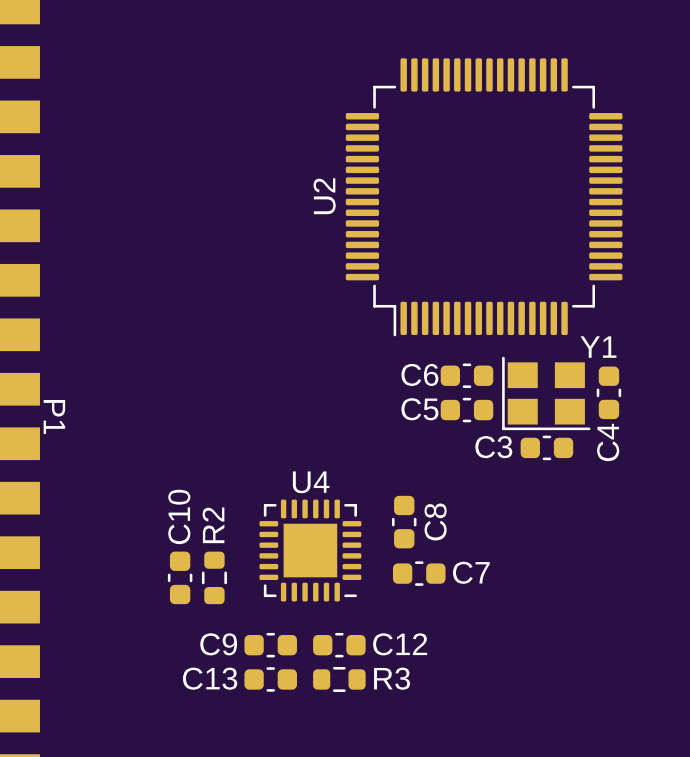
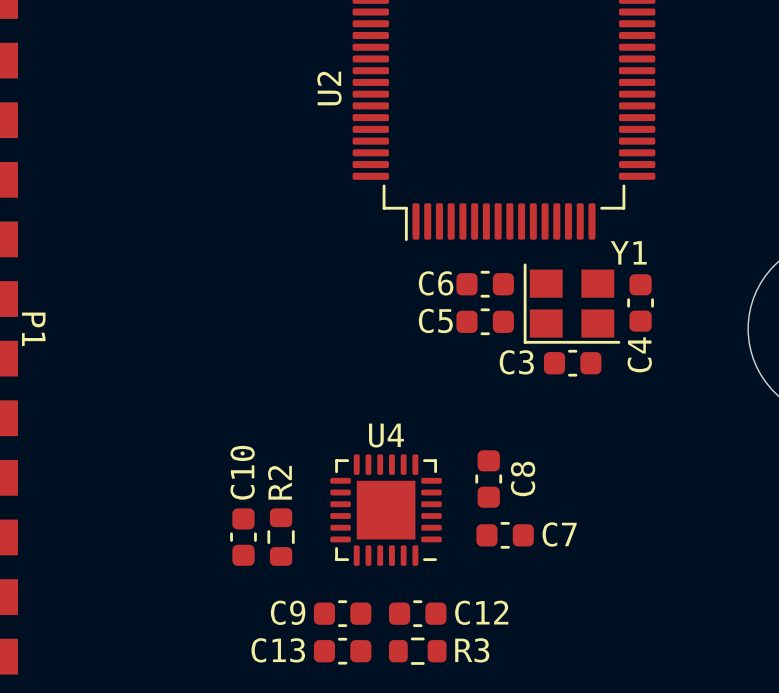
C8 position: (404, 522) -> (488, 479)
U4 position: (310, 550) -> (386, 510)
C7 position: (419, 573) -> (505, 535)
C10 position: (180, 577) -> (243, 537)
R2 position: (214, 577) -> (281, 537)
C9 position: (270, 645) -> (342, 613)
C12 position: (339, 645) -> (417, 613)
C13 position: (270, 679) -> (342, 651)
R3 position: (339, 679) -> (417, 651)

